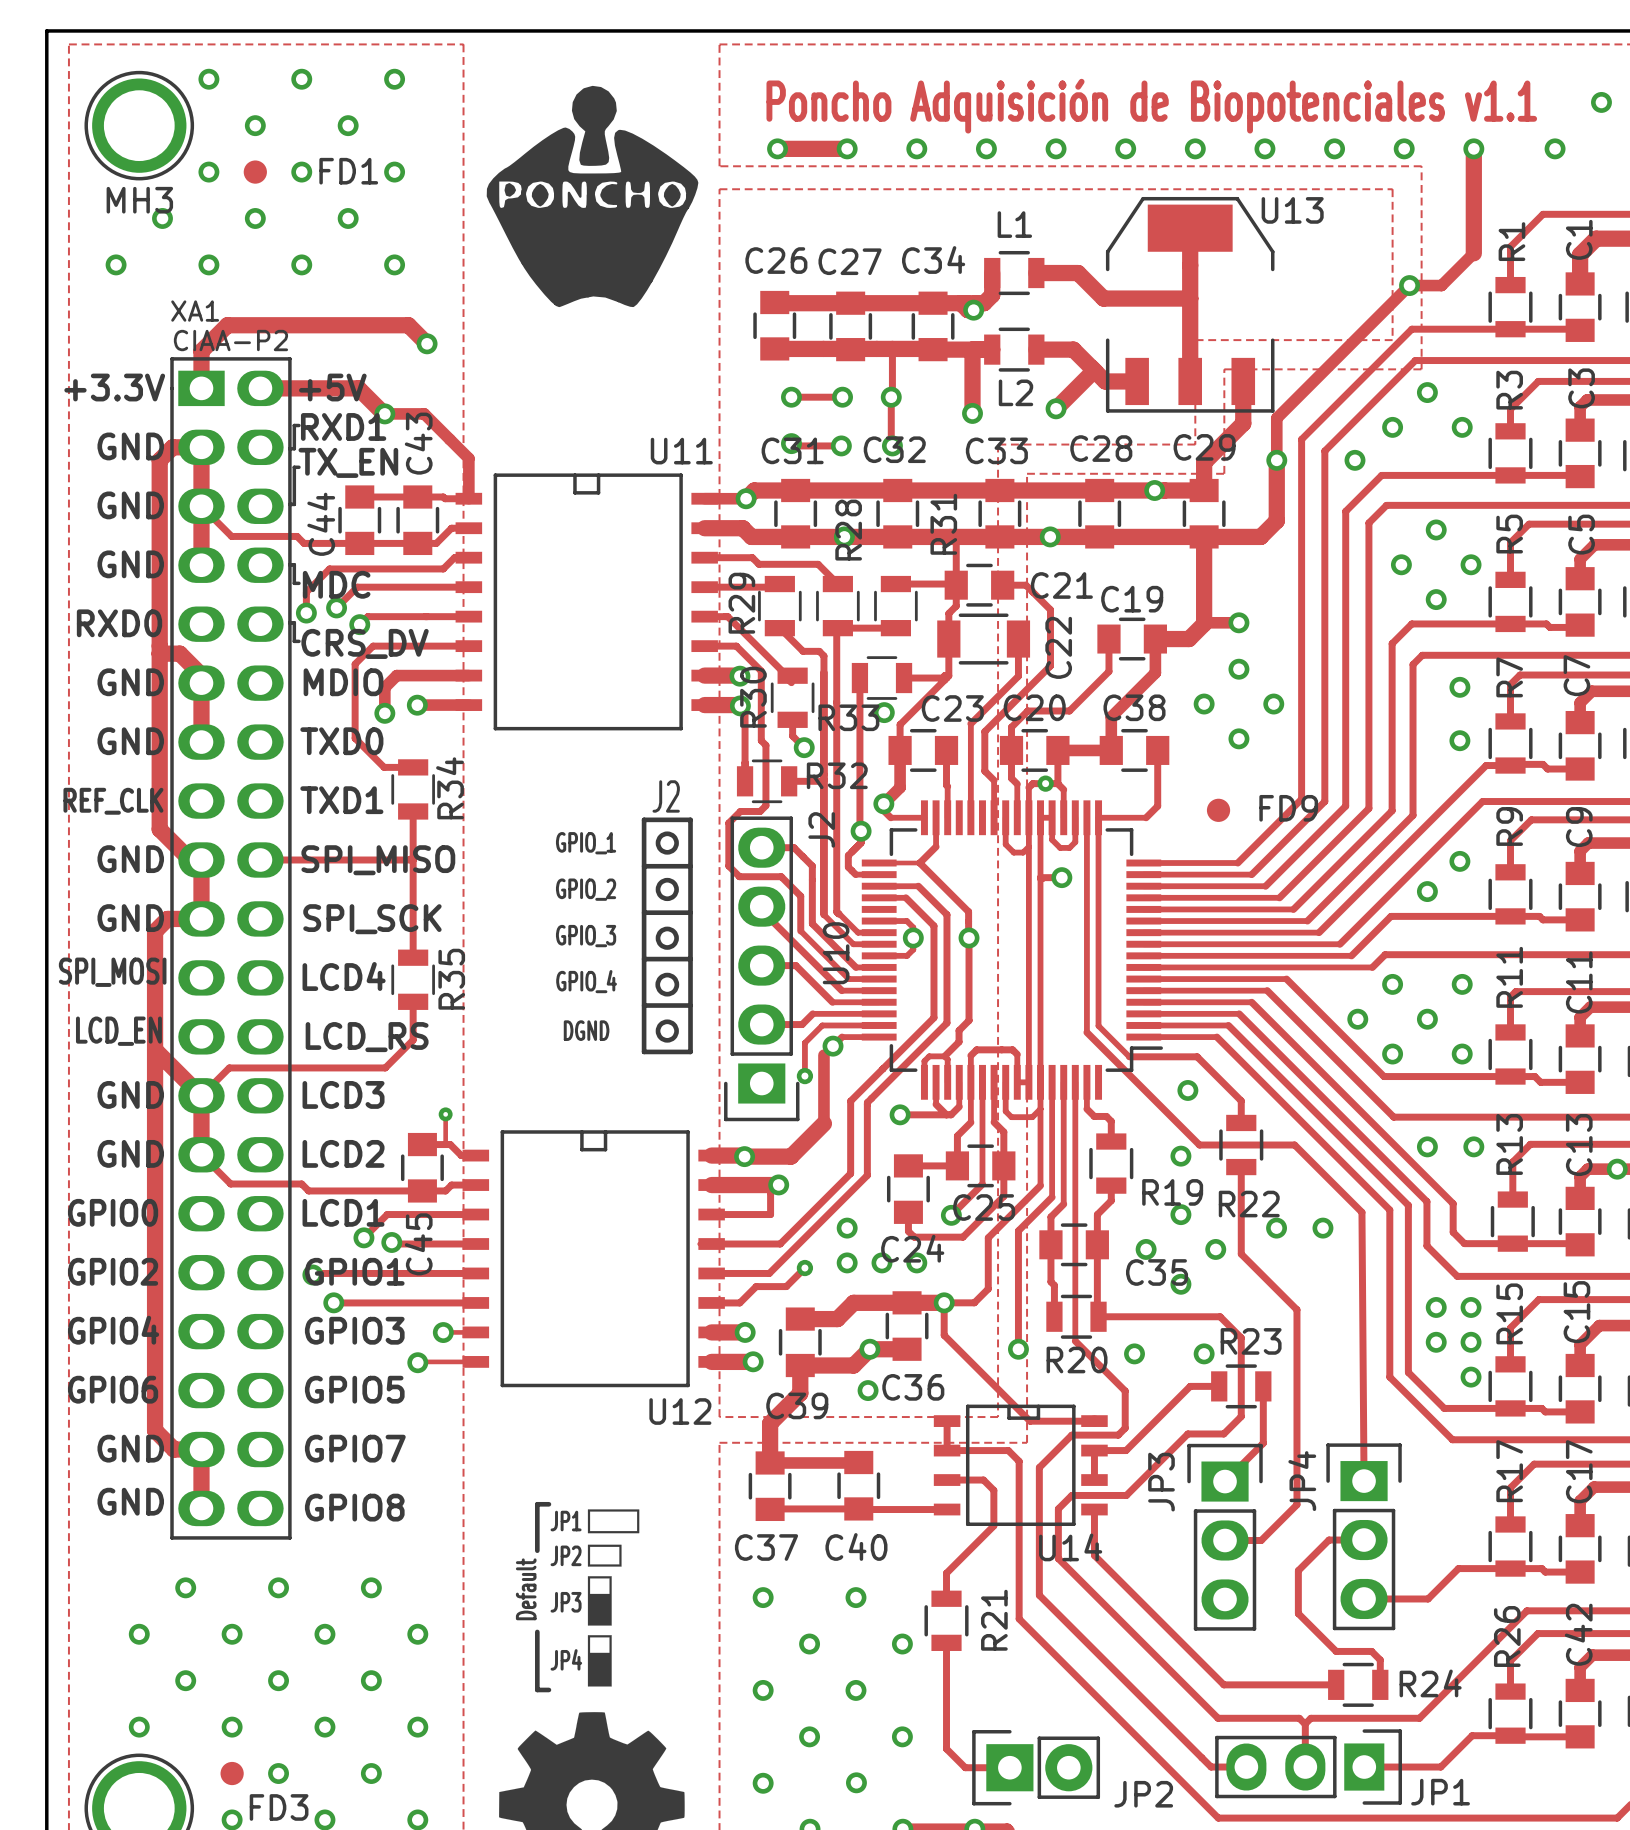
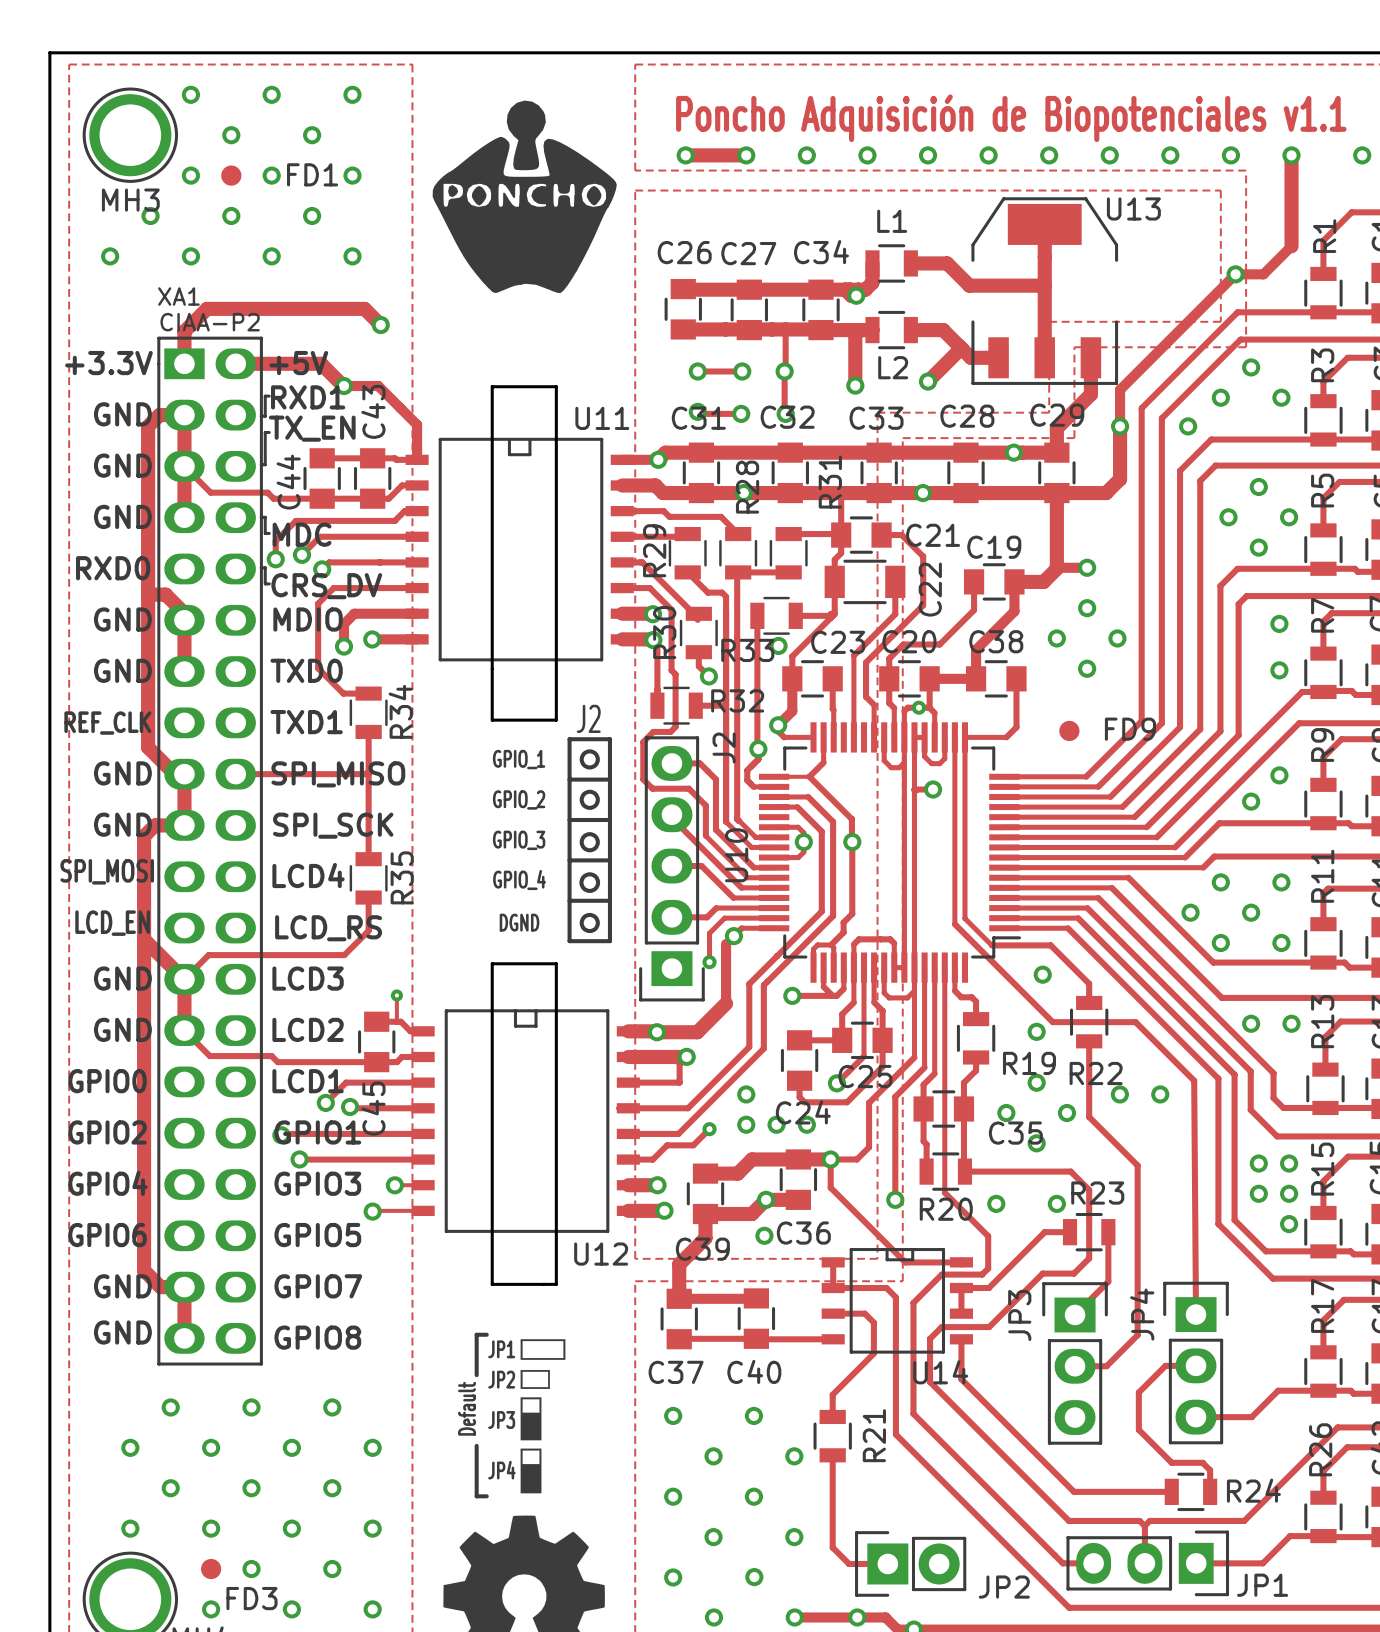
board edge: none -> (492, 386) (556, 386) (556, 720) (492, 720) (492, 386)
board edge: none -> (492, 963) (492, 1284) (556, 1284) (556, 963) (492, 963)

